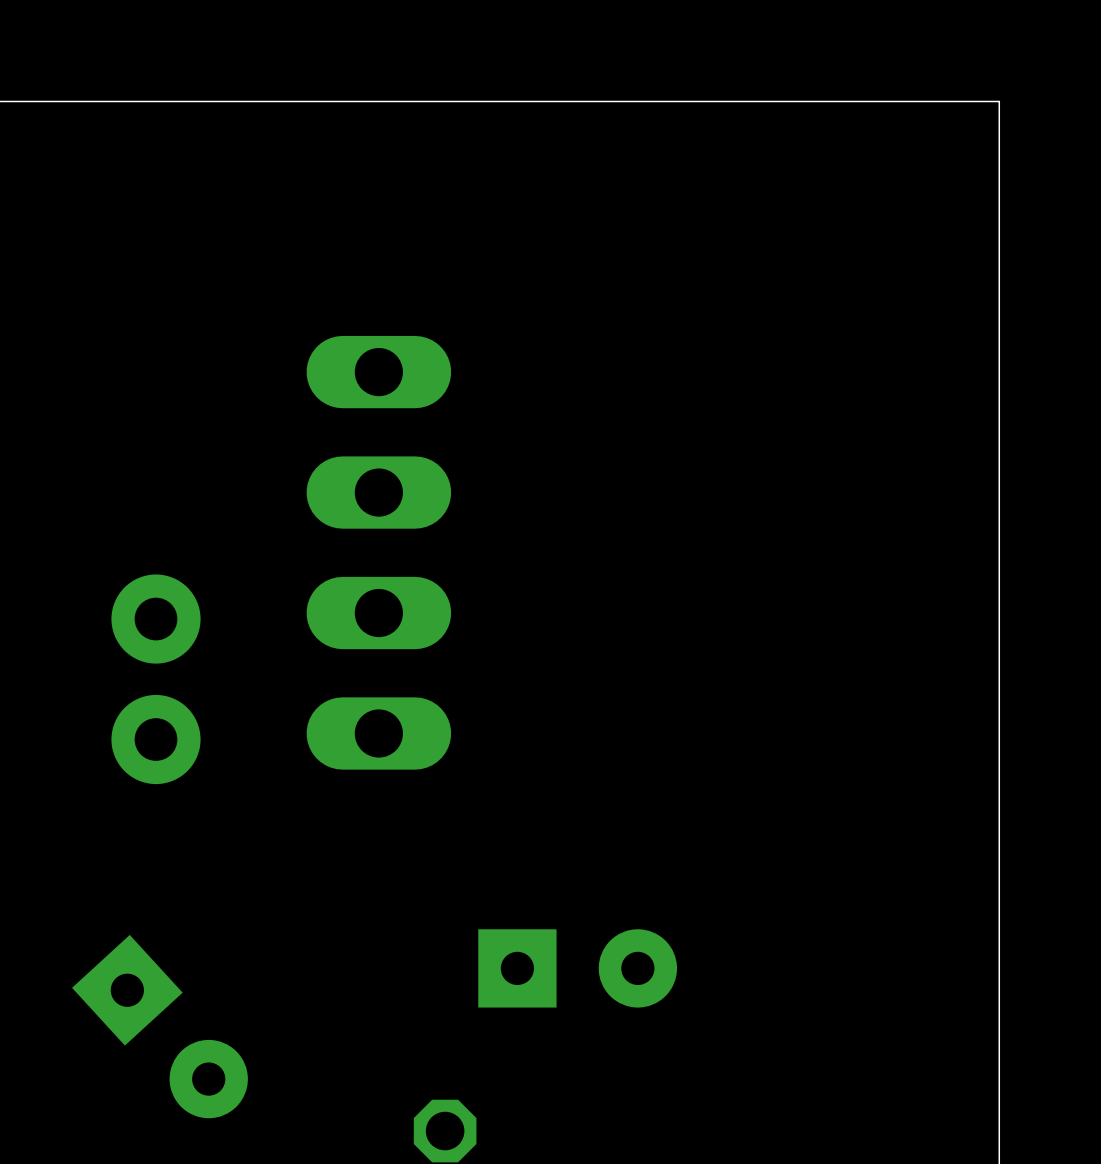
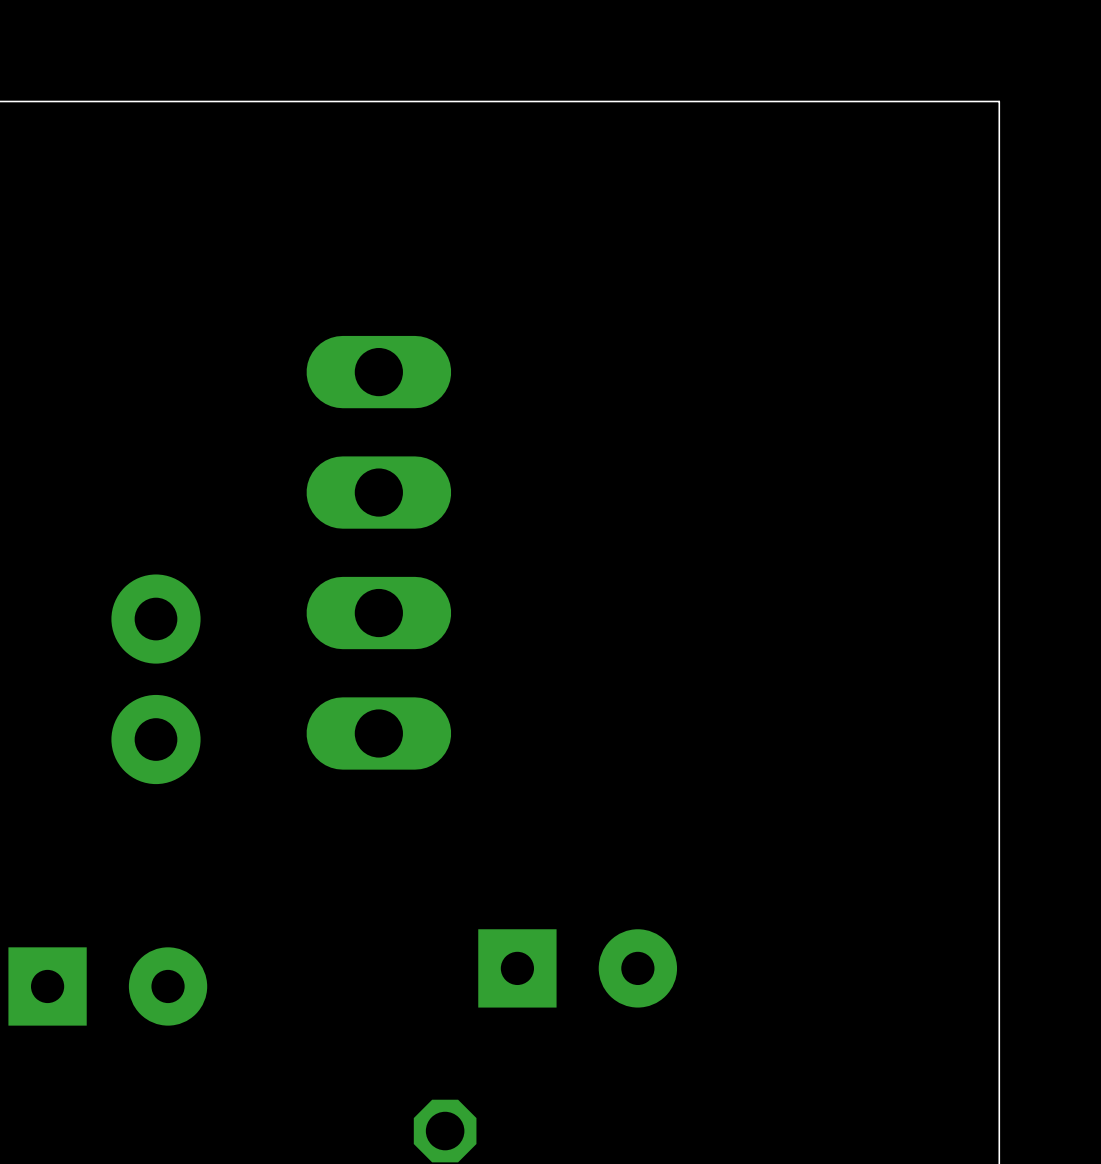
part: none -> (107, 986)
part: (159, 1026) -> none

